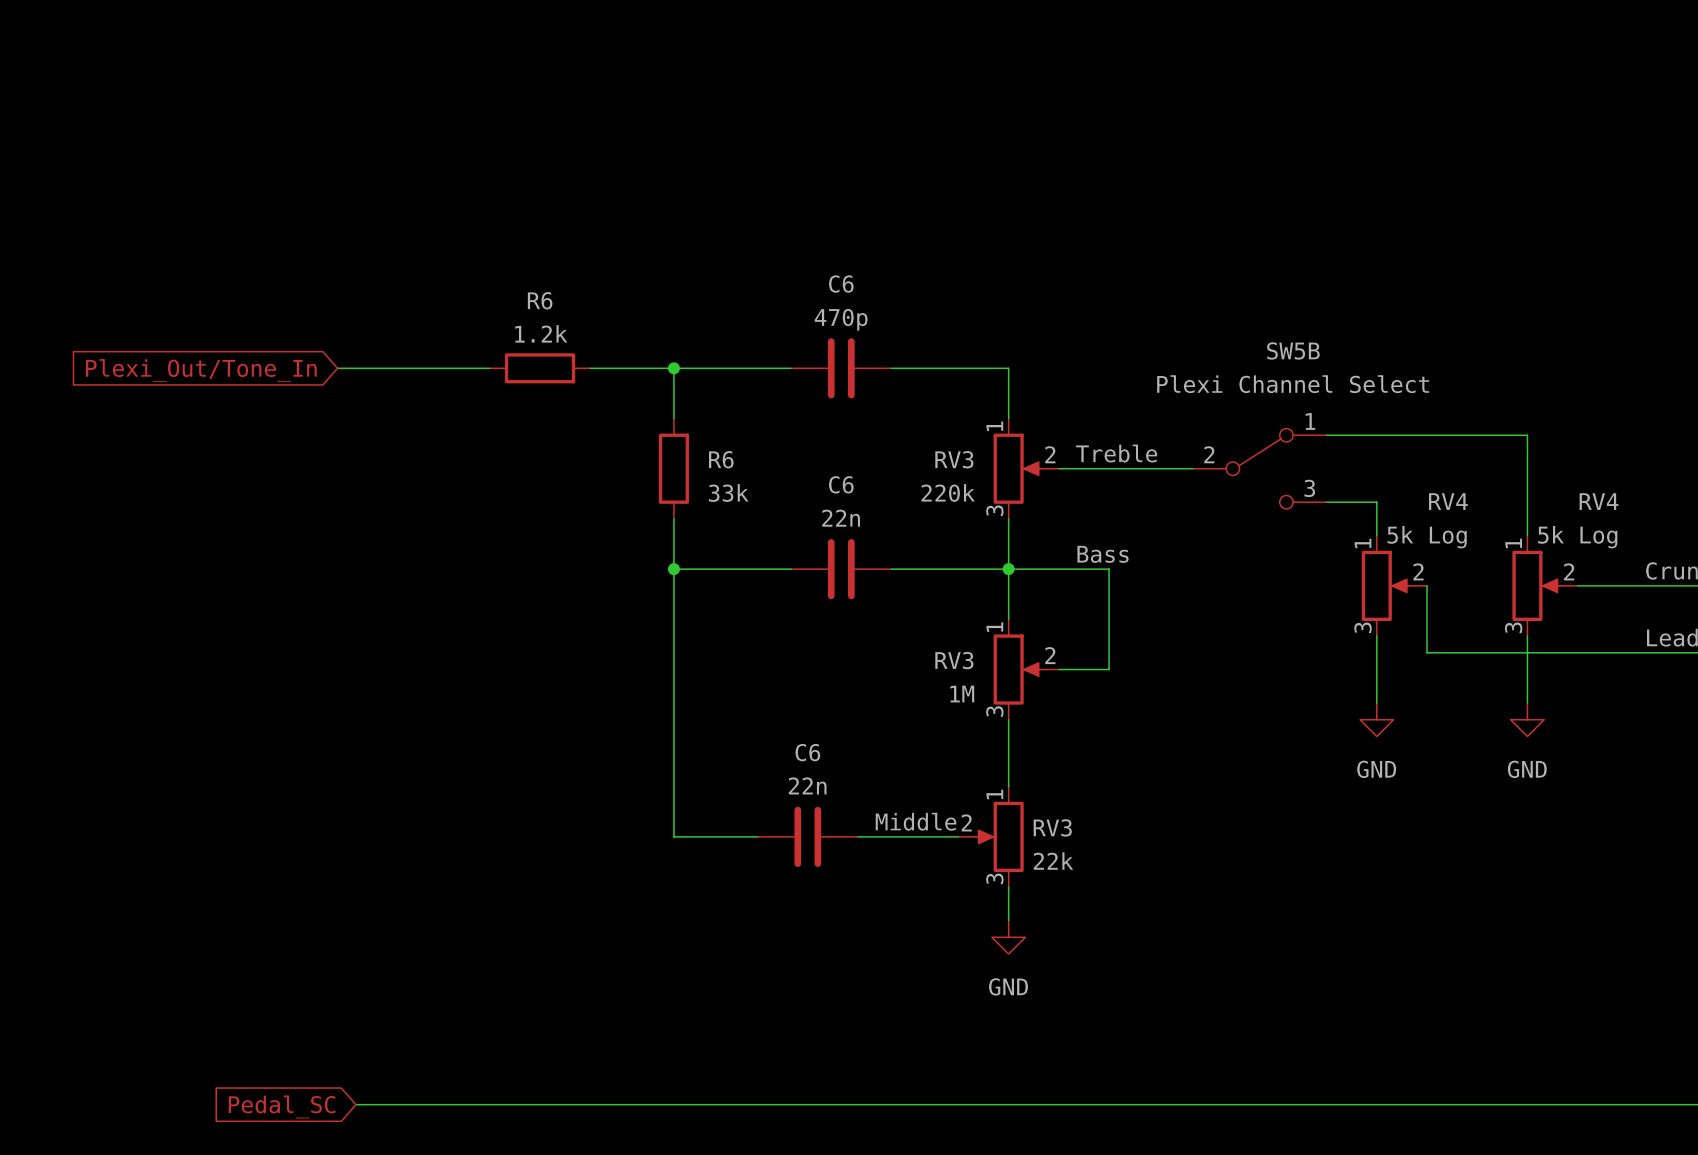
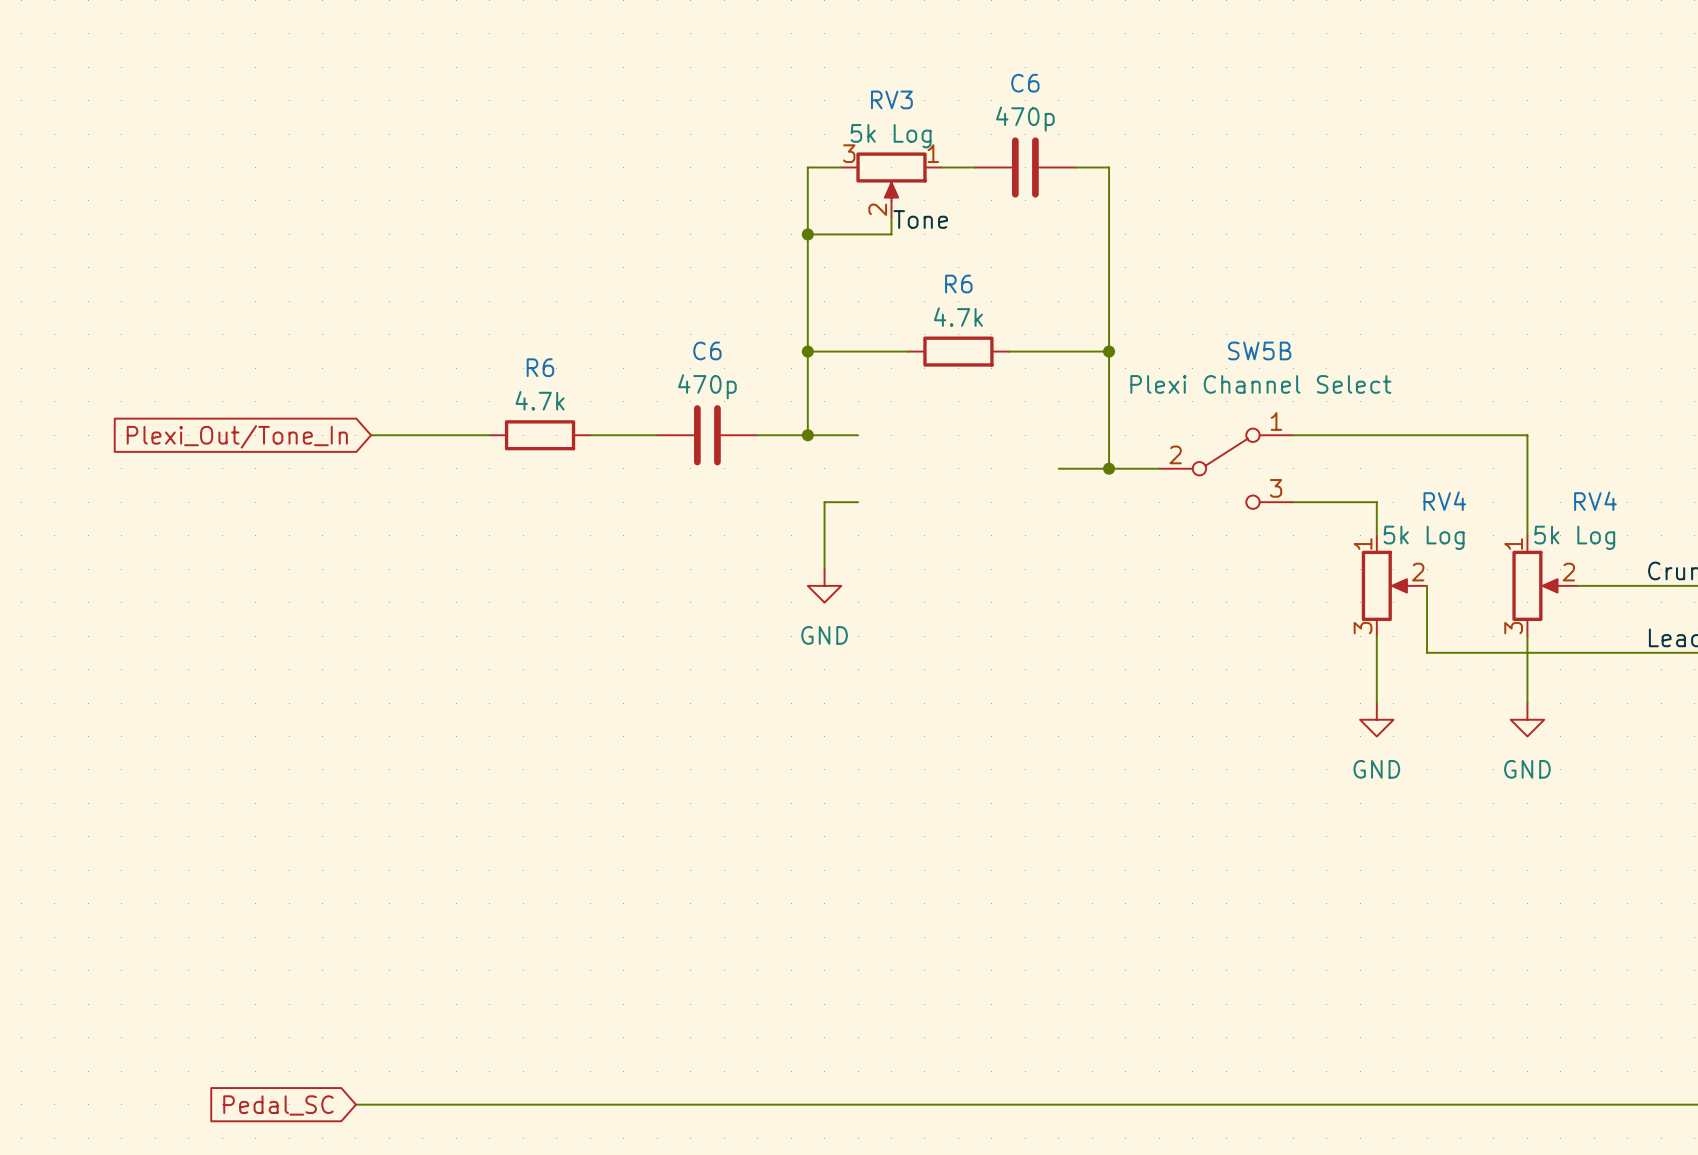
wire: none -> (841, 167) (807, 167) (807, 435)
wire: none -> (941, 167) (975, 167)
C6: none -> 470p (1025, 167)
wire: none -> (1075, 167) (1109, 167) (1109, 468)
RV3: none -> 5k Log (891, 185)
wire: none -> (891, 217) (891, 234) (807, 234)
label: none -> Tone (920, 219)
junction: none -> (807, 234)
wire: none -> (807, 351) (908, 351)
junction: none -> (807, 351)
R6: none -> 4.7k (958, 351)
wire: none -> (1008, 351) (1109, 351)
junction: none -> (1109, 351)
wire: (337, 368) (489, 368) -> none
R6: 1.2k (540, 368) -> none
wire: (590, 368) (791, 368) -> none
wire: (673, 368) (673, 418) -> none
junction: (673, 368) -> none
C6: 470p (841, 368) -> none
wire: (891, 368) (1008, 368) (1008, 418) -> none
global label position: Plexi_Out/Tone_In (201, 370) -> Plexi_Out/Tone_In (237, 436)
wire: none -> (371, 435) (489, 435)
R6: none -> 4.7k (540, 435)
wire: none -> (590, 435) (657, 435)
C6: none -> 470p (707, 435)
wire: none -> (757, 435) (858, 435)
junction: none -> (807, 435)
label: Treble (1116, 453) -> none
R6: 33k (673, 468) -> none
RV3: 220k (1026, 468) -> none
junction: none -> (1109, 468)
SW5B position: (1259, 468) -> (1226, 468)
wire: none -> (858, 502) (824, 502) (824, 569)
wire: (673, 518) (673, 836) (757, 836) -> none
wire: (1008, 518) (1008, 619) -> none
label: Bass (1103, 554) -> none
wire: (673, 569) (791, 569) -> none
junction: (673, 569) -> none
C6: 22n (841, 569) -> none
wire: (891, 569) (1109, 569) (1109, 669) (1058, 669) -> none
junction: (1008, 569) -> none
power symbol: none -> GND (824, 585)
RV3: 1M (1026, 669) -> none
wire: (1008, 719) (1008, 786) -> none
label: Middle (916, 821) -> none
C6: 22n (807, 836) -> none
wire: (858, 836) (958, 836) -> none
RV3: 22k (991, 836) -> none
wire: (1008, 887) (1008, 920) -> none
power symbol: GND (1008, 937) -> none

